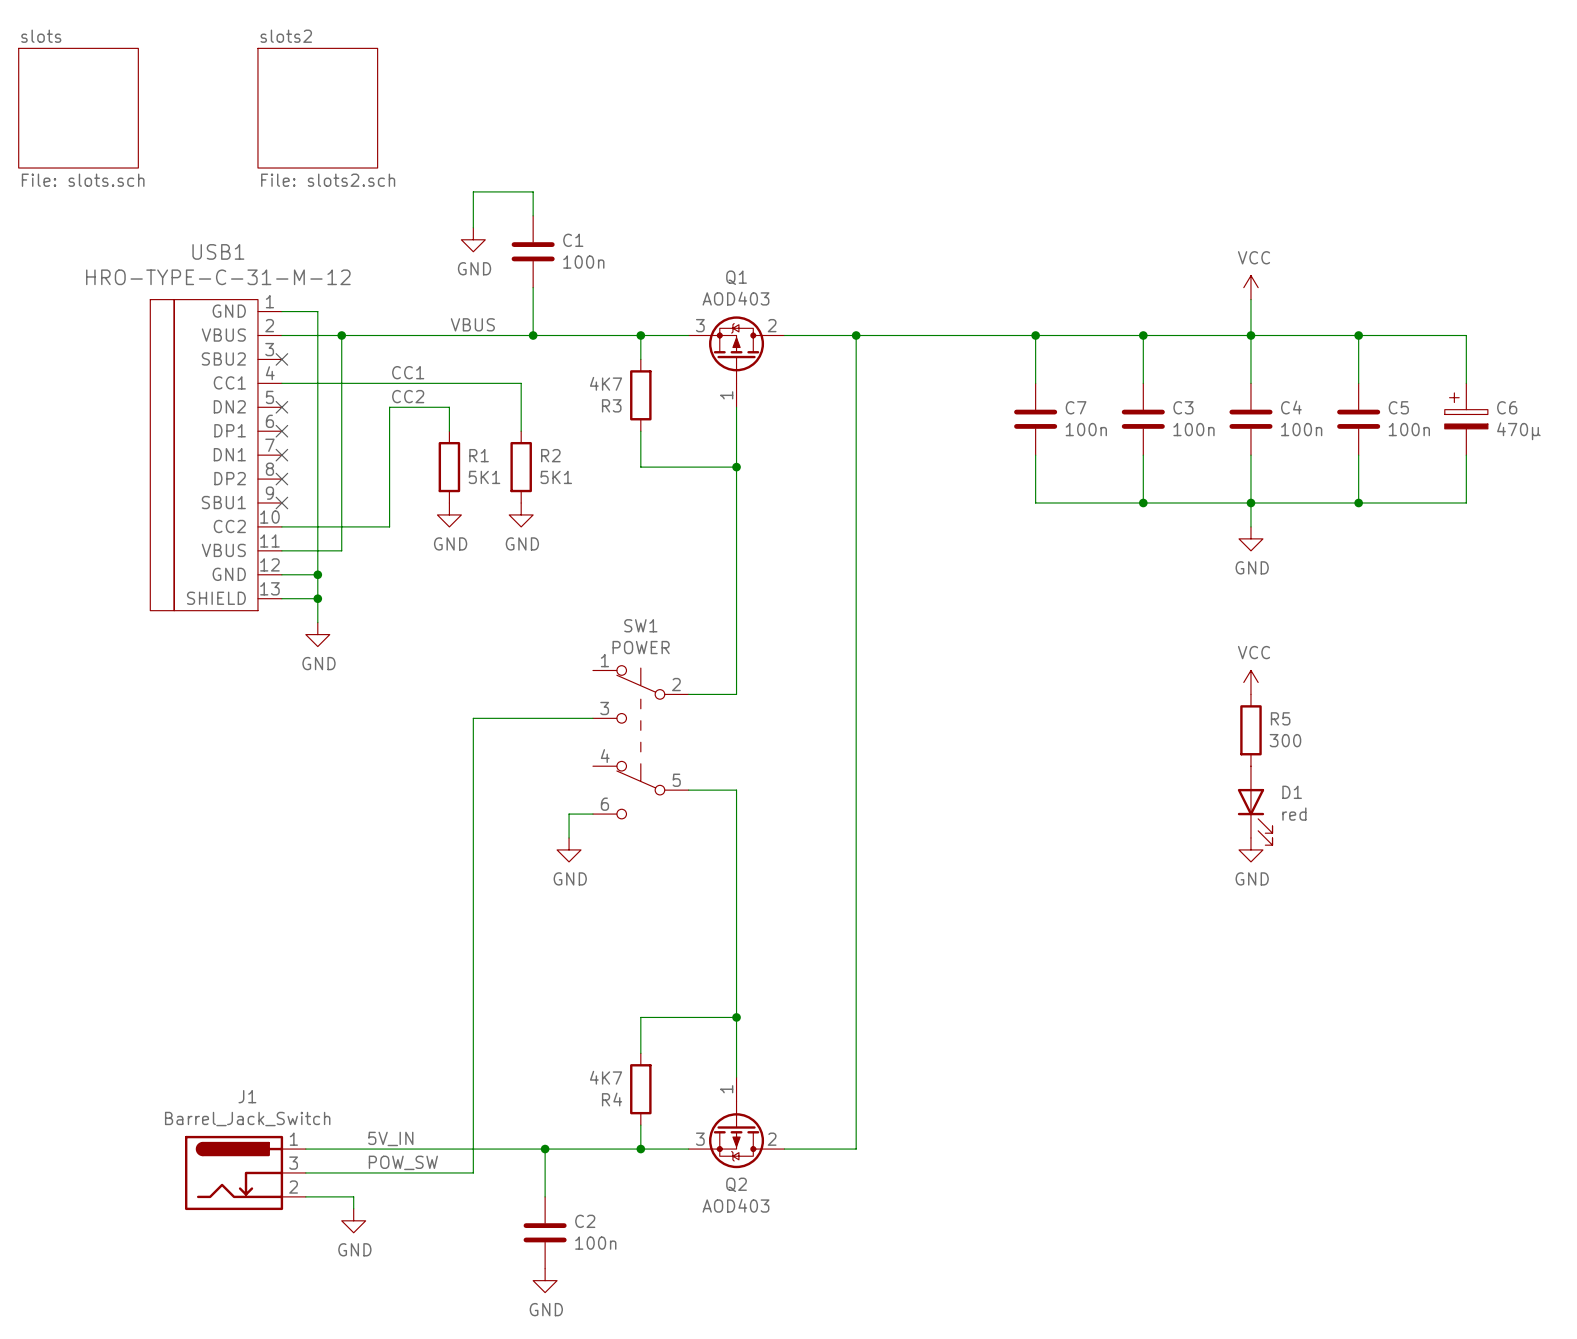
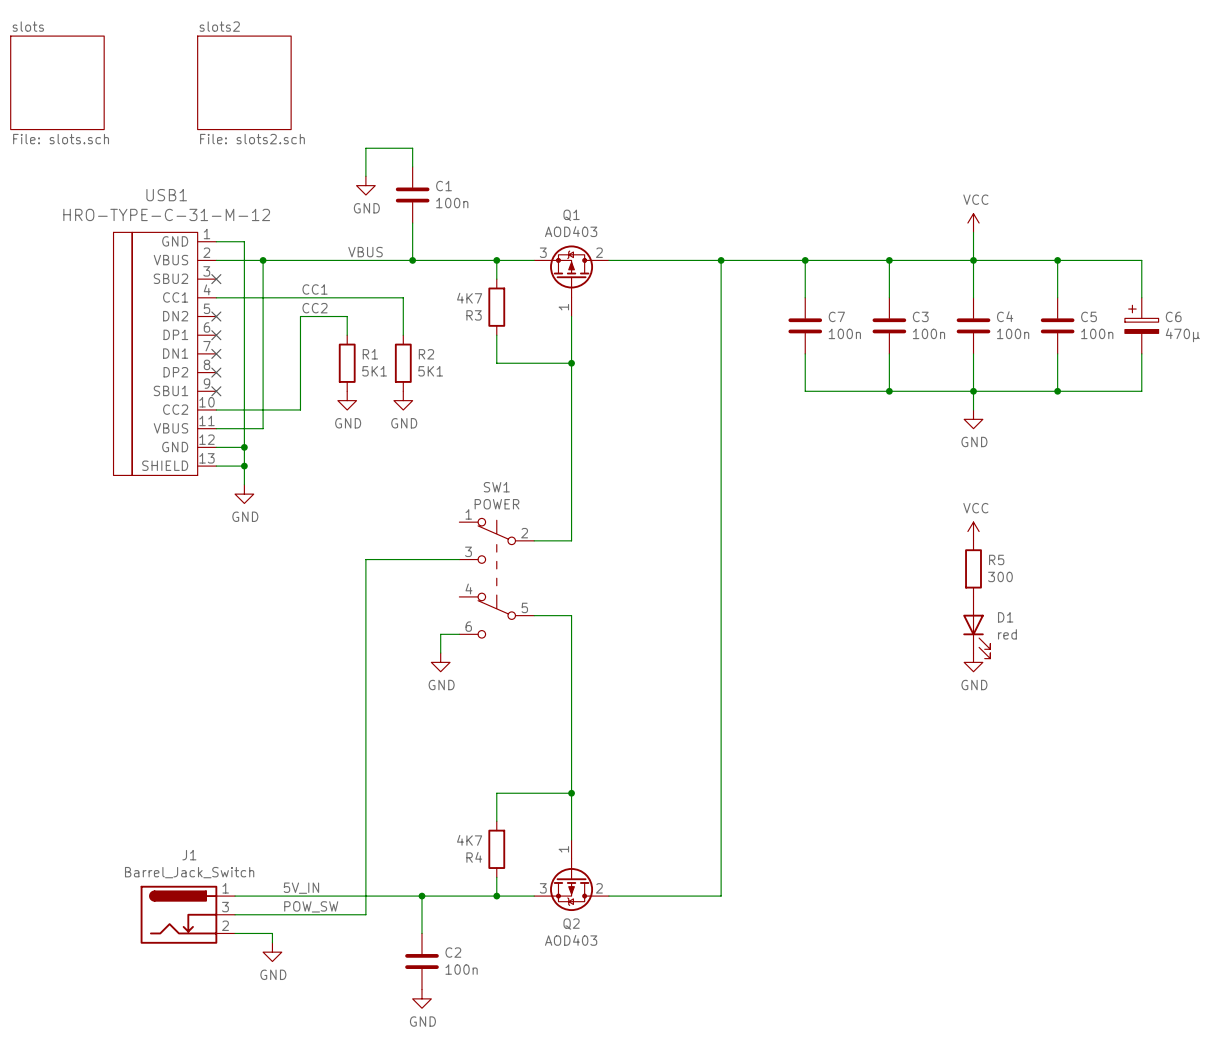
wire: (856, 335) (856, 1149) -> (721, 260) (721, 896) (665, 896)
junction: (856, 335) -> none
junction: none -> (721, 260)

